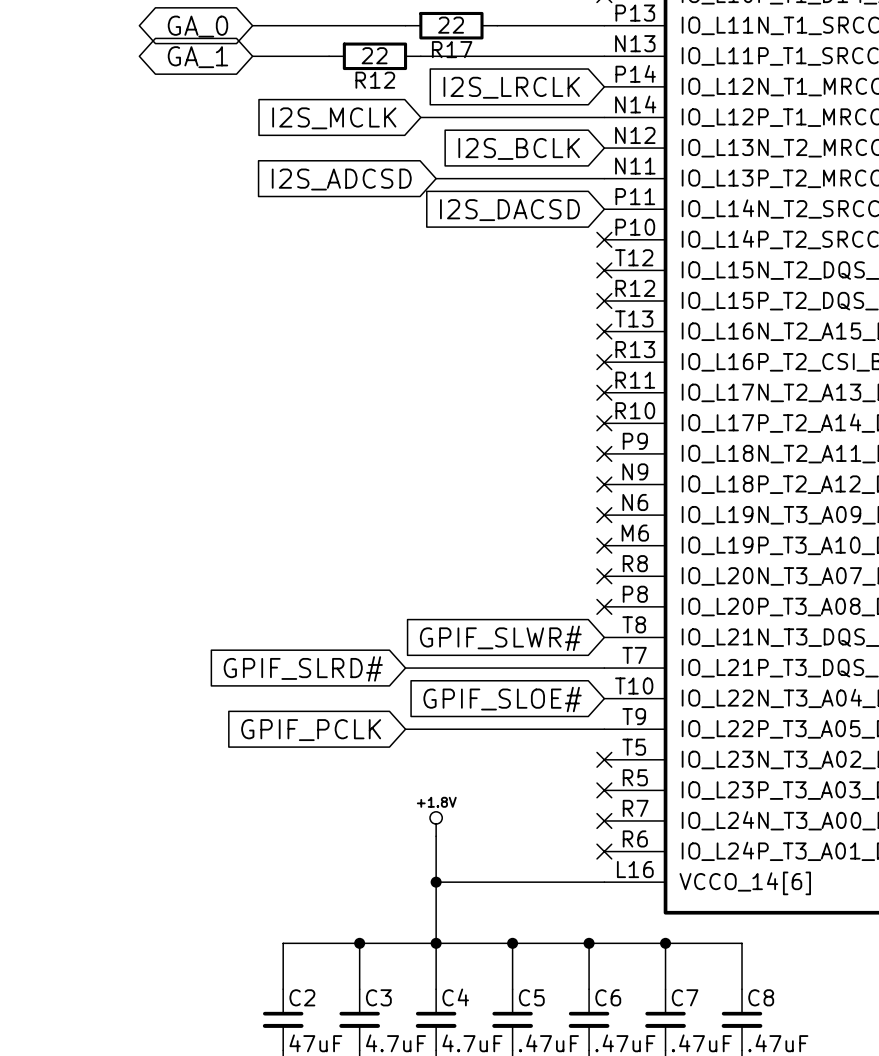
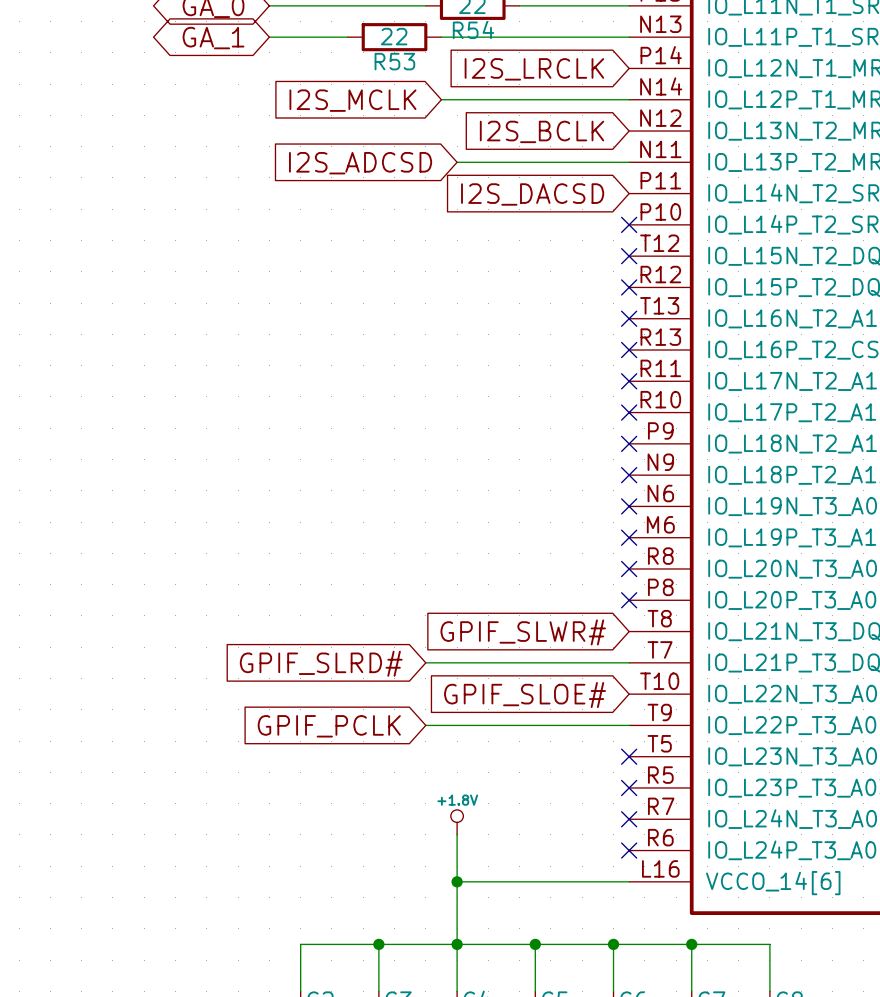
R17 name: R17 (452, 49) -> R54 (473, 29)
R12 name: R12 (375, 80) -> R53 (394, 61)

